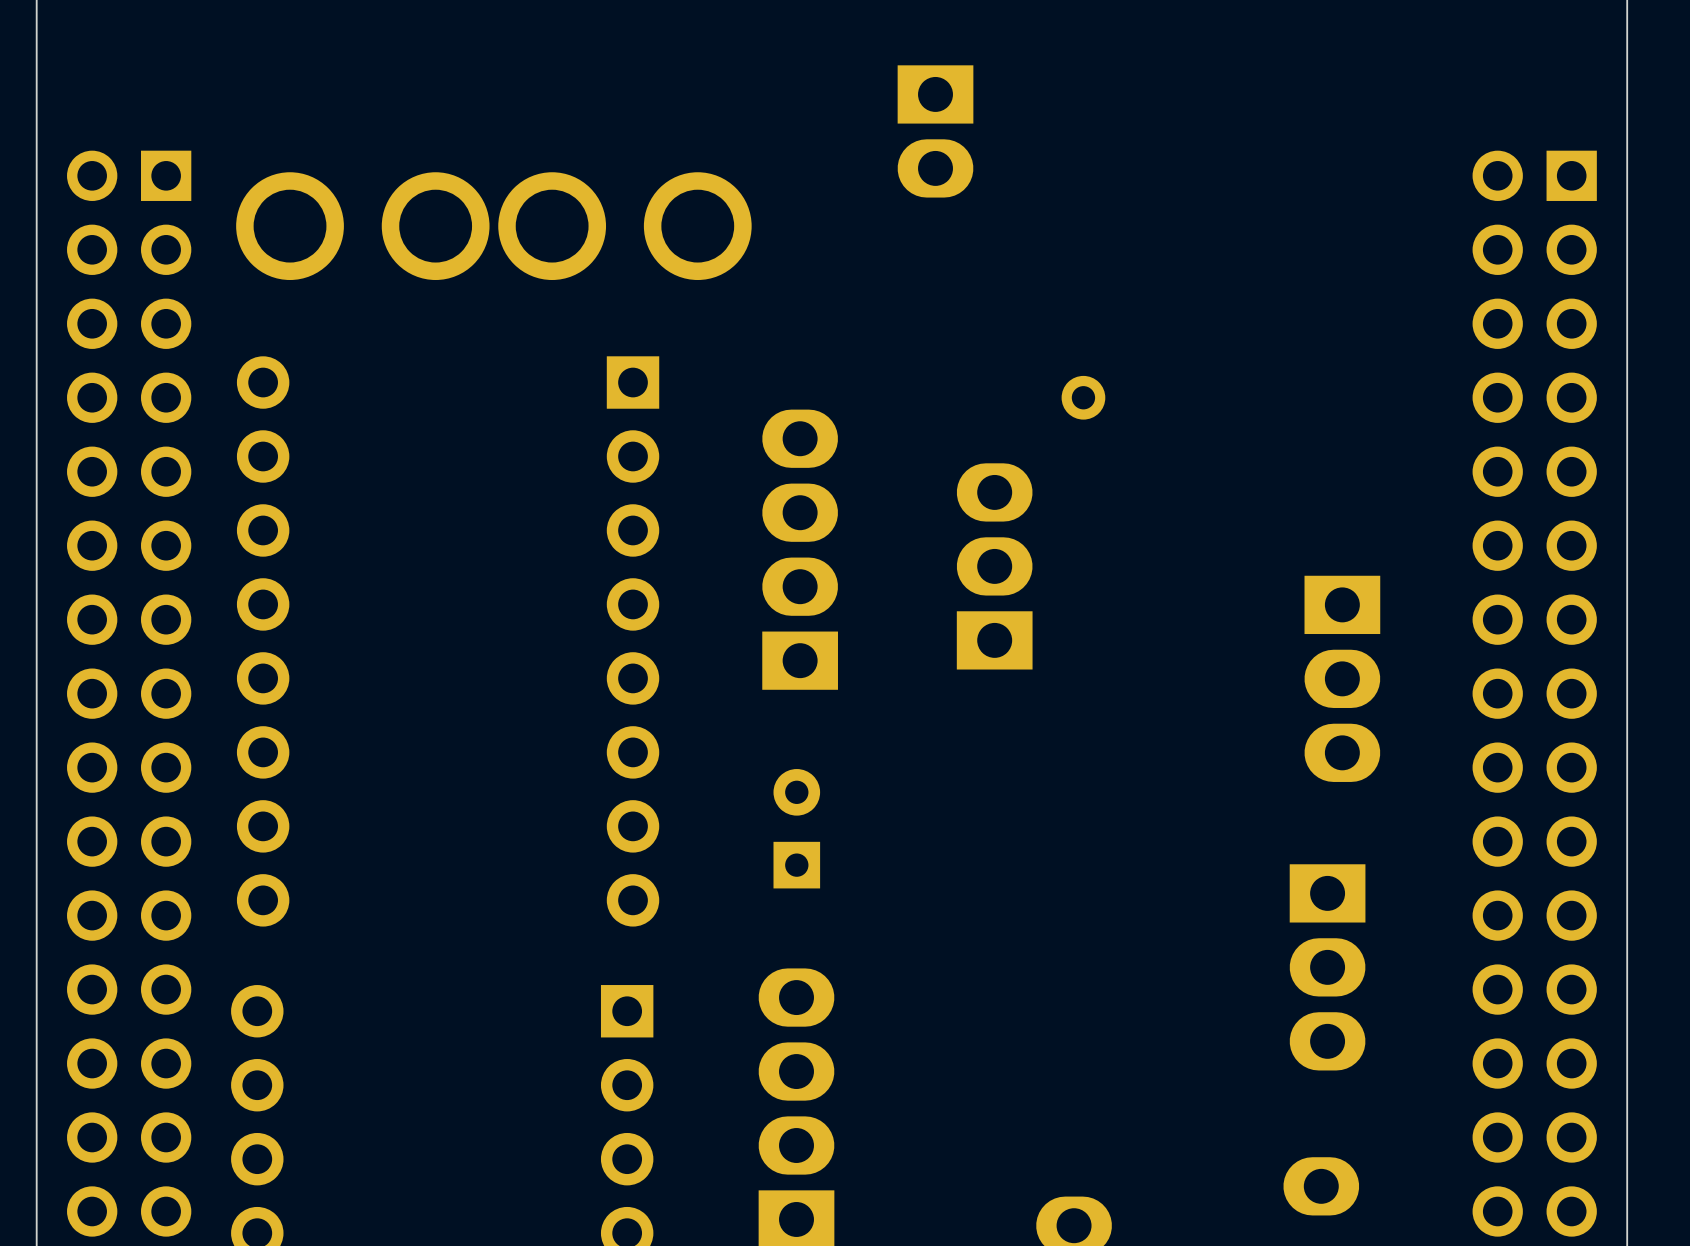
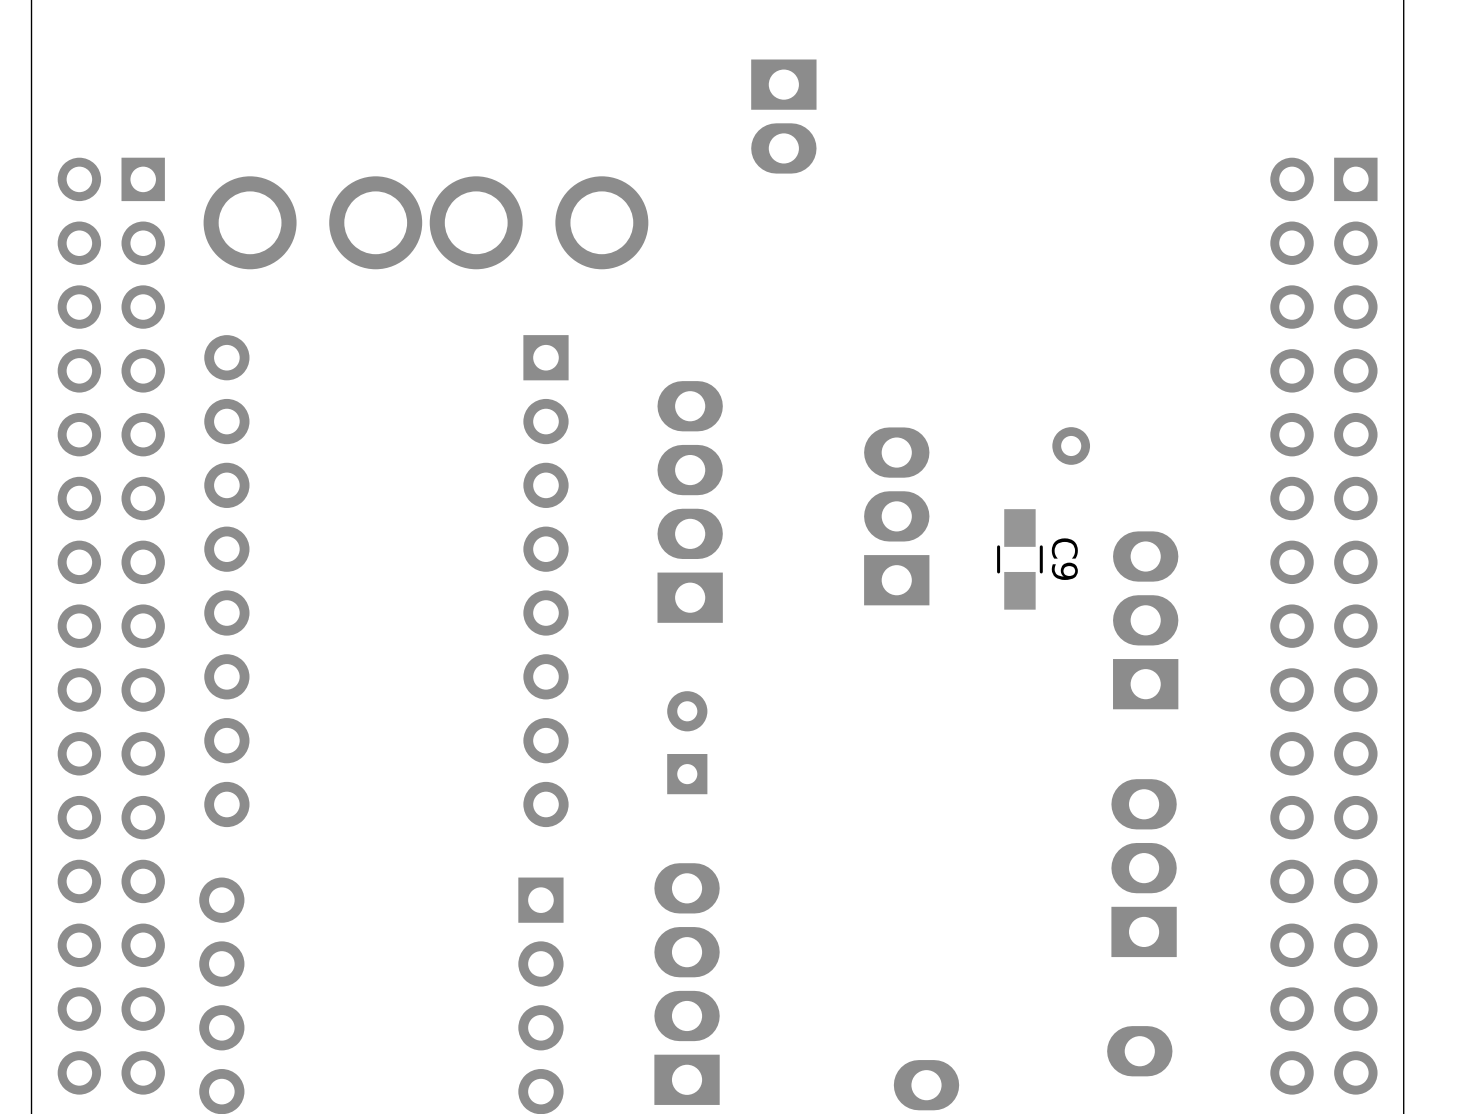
part position: (935, 131) -> (783, 116)
part position: (1083, 397) -> (1071, 445)
part position: (994, 566) -> (896, 516)
C9: none -> (1019, 559)
part rotation: 0° (1342, 678) -> 180° (1145, 620)
part rotation: 0° (1327, 967) -> 180° (1144, 868)

